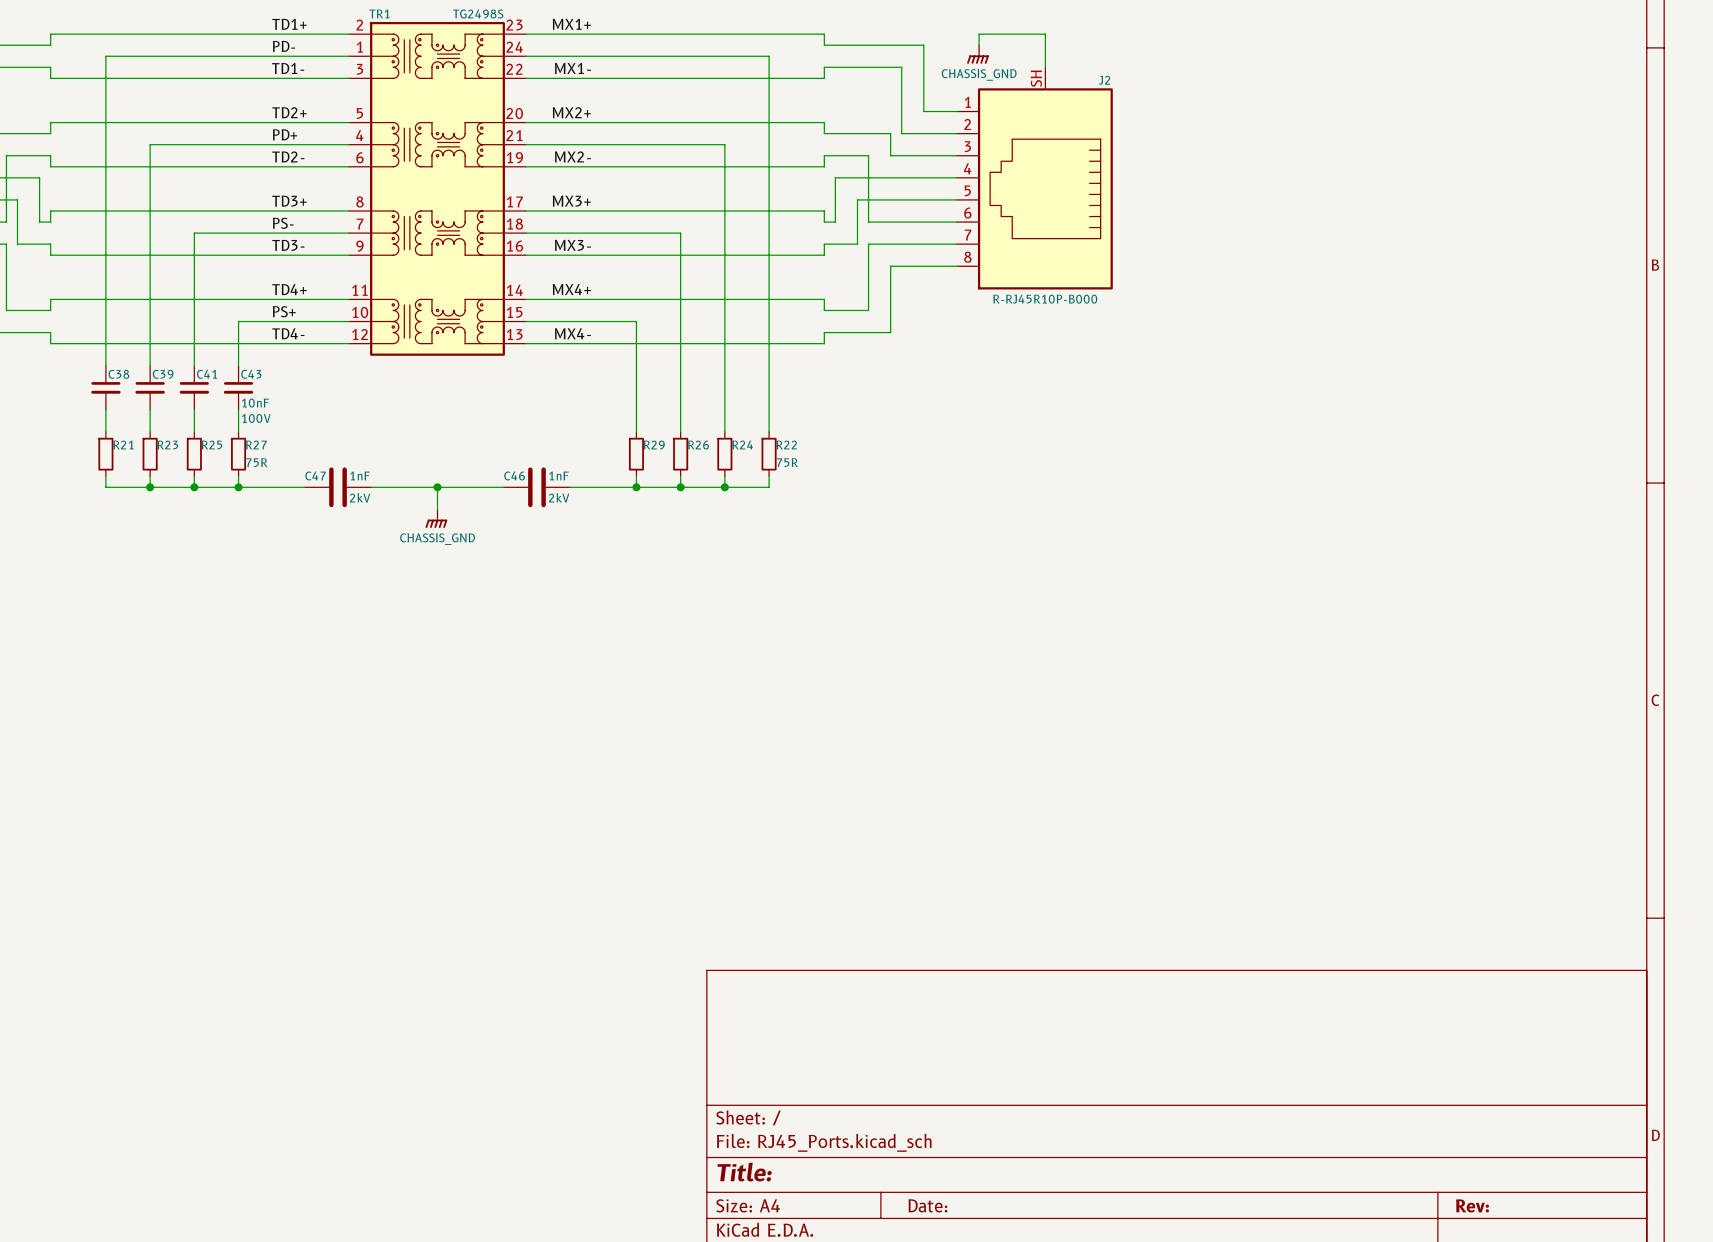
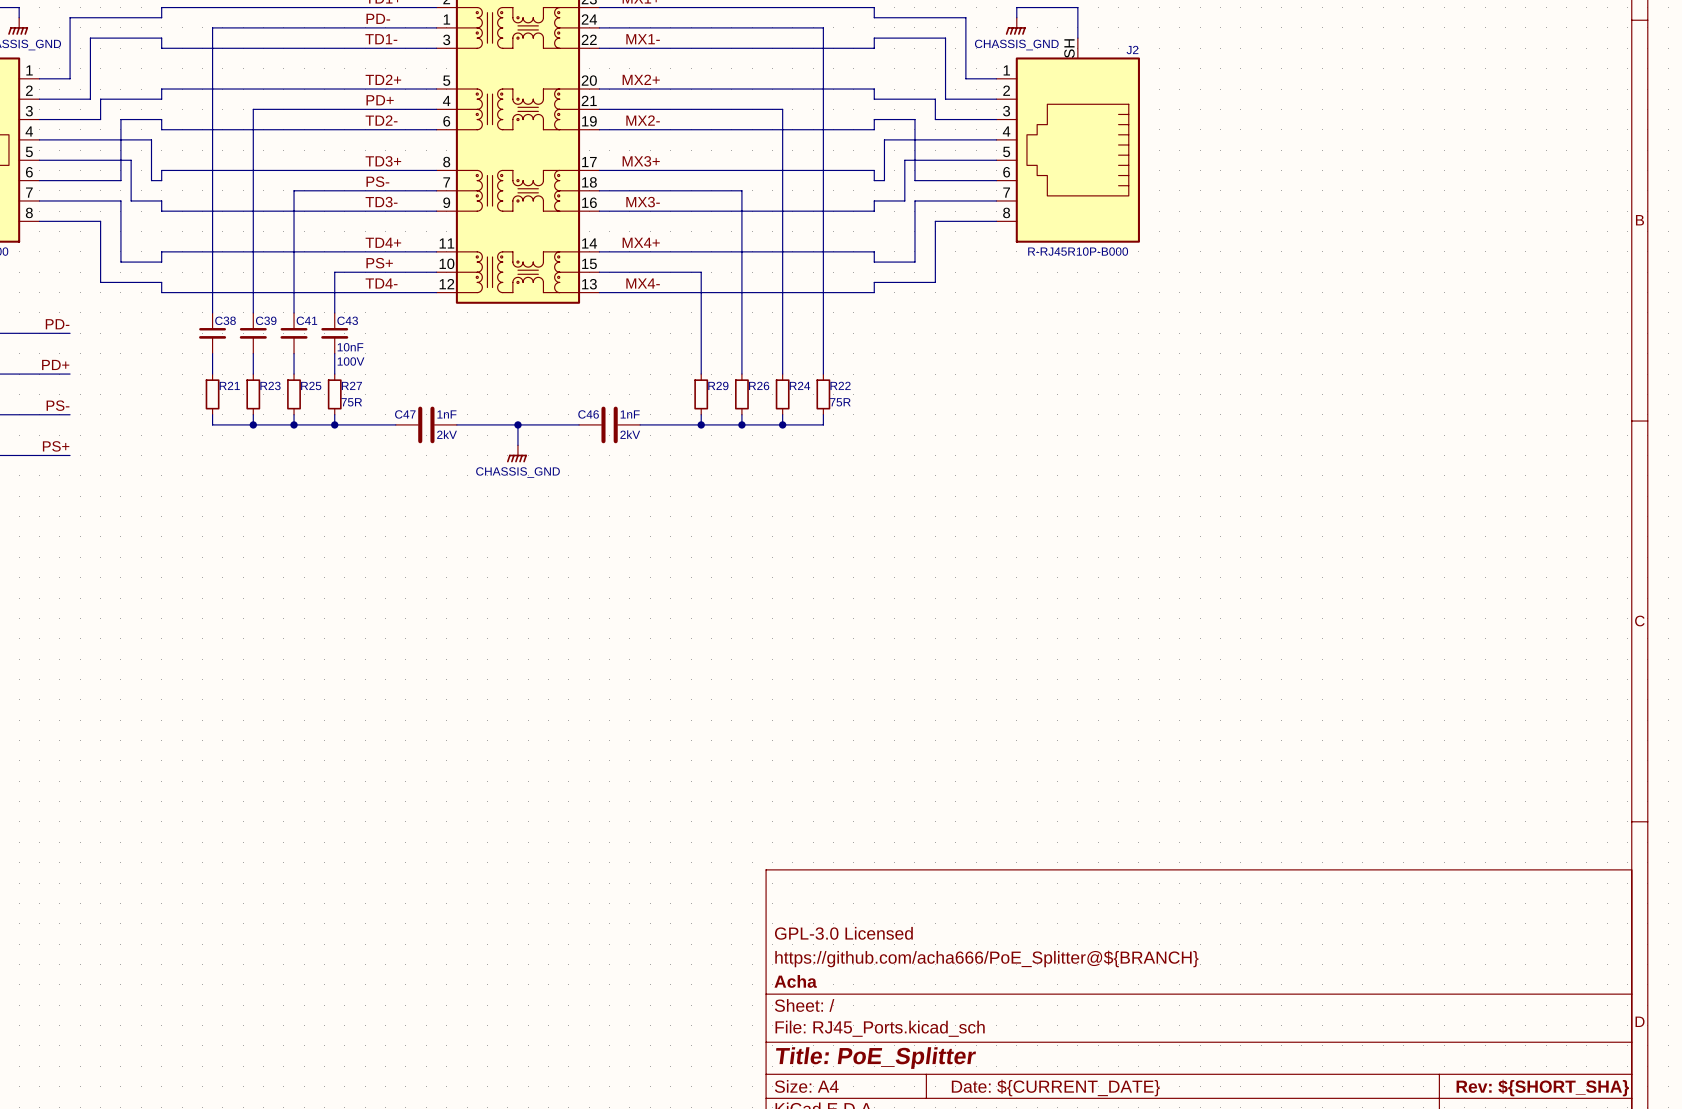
title block: none -> GPL-3.0 Licensed (843, 933)
title block: none -> https://github.com/acha666/PoE_Splitter@${BRANCH} (986, 958)
title block: none -> Acha (795, 981)
title block: Title: (744, 1172) -> Title: PoE_Splitter (875, 1058)
title block: Date: (927, 1205) -> Date: ${CURRENT_DATE} (1055, 1088)
title block: Rev: (1472, 1205) -> Rev: ${SHORT_SHA} (1542, 1088)

